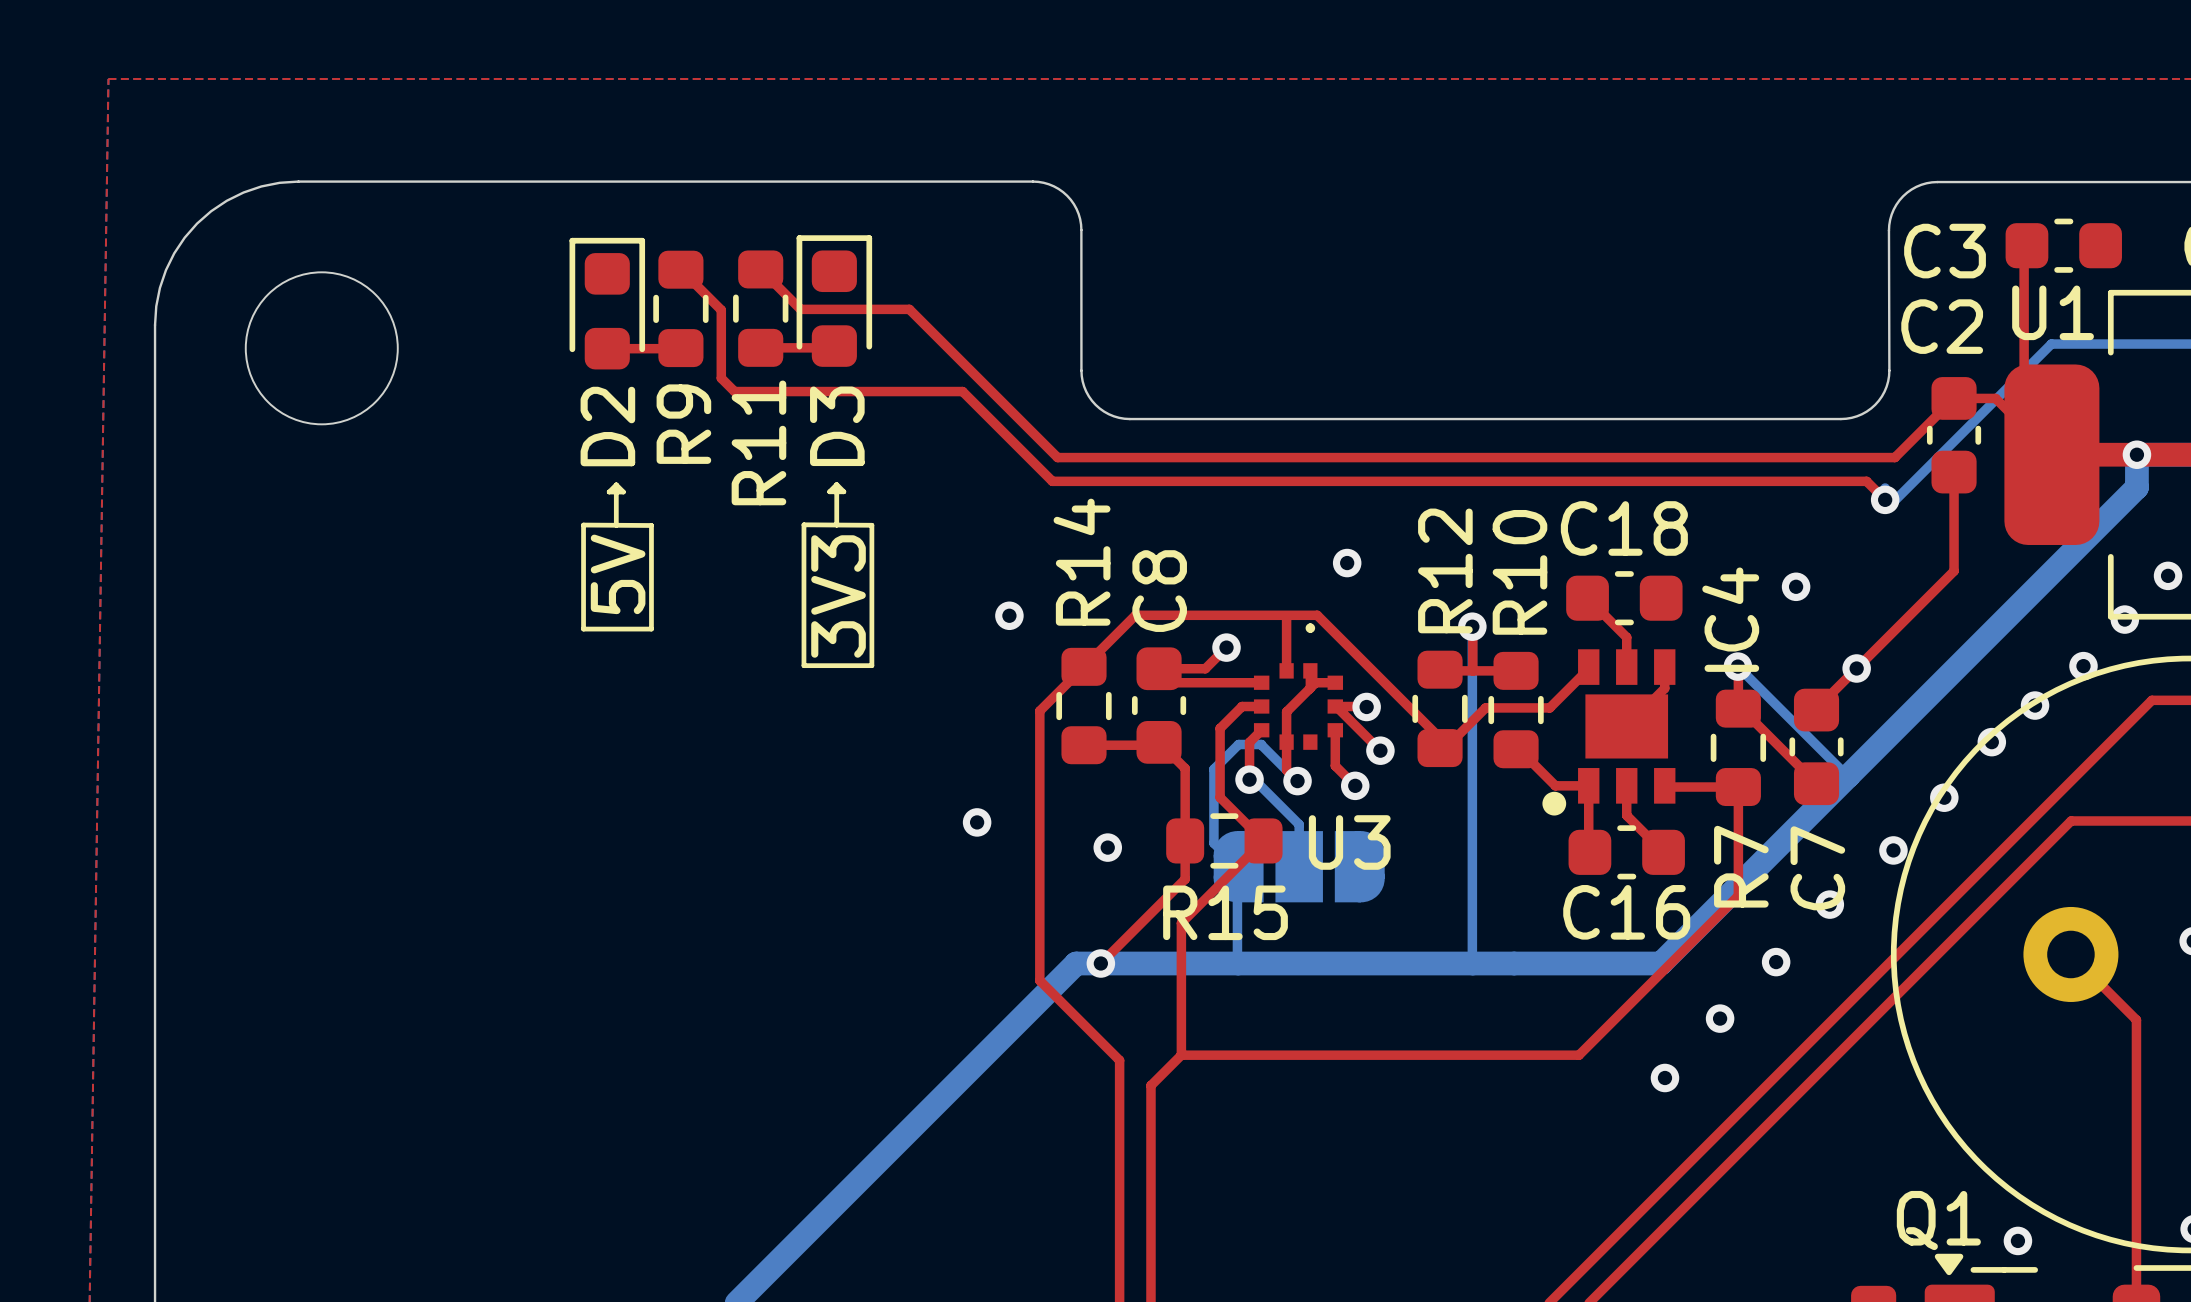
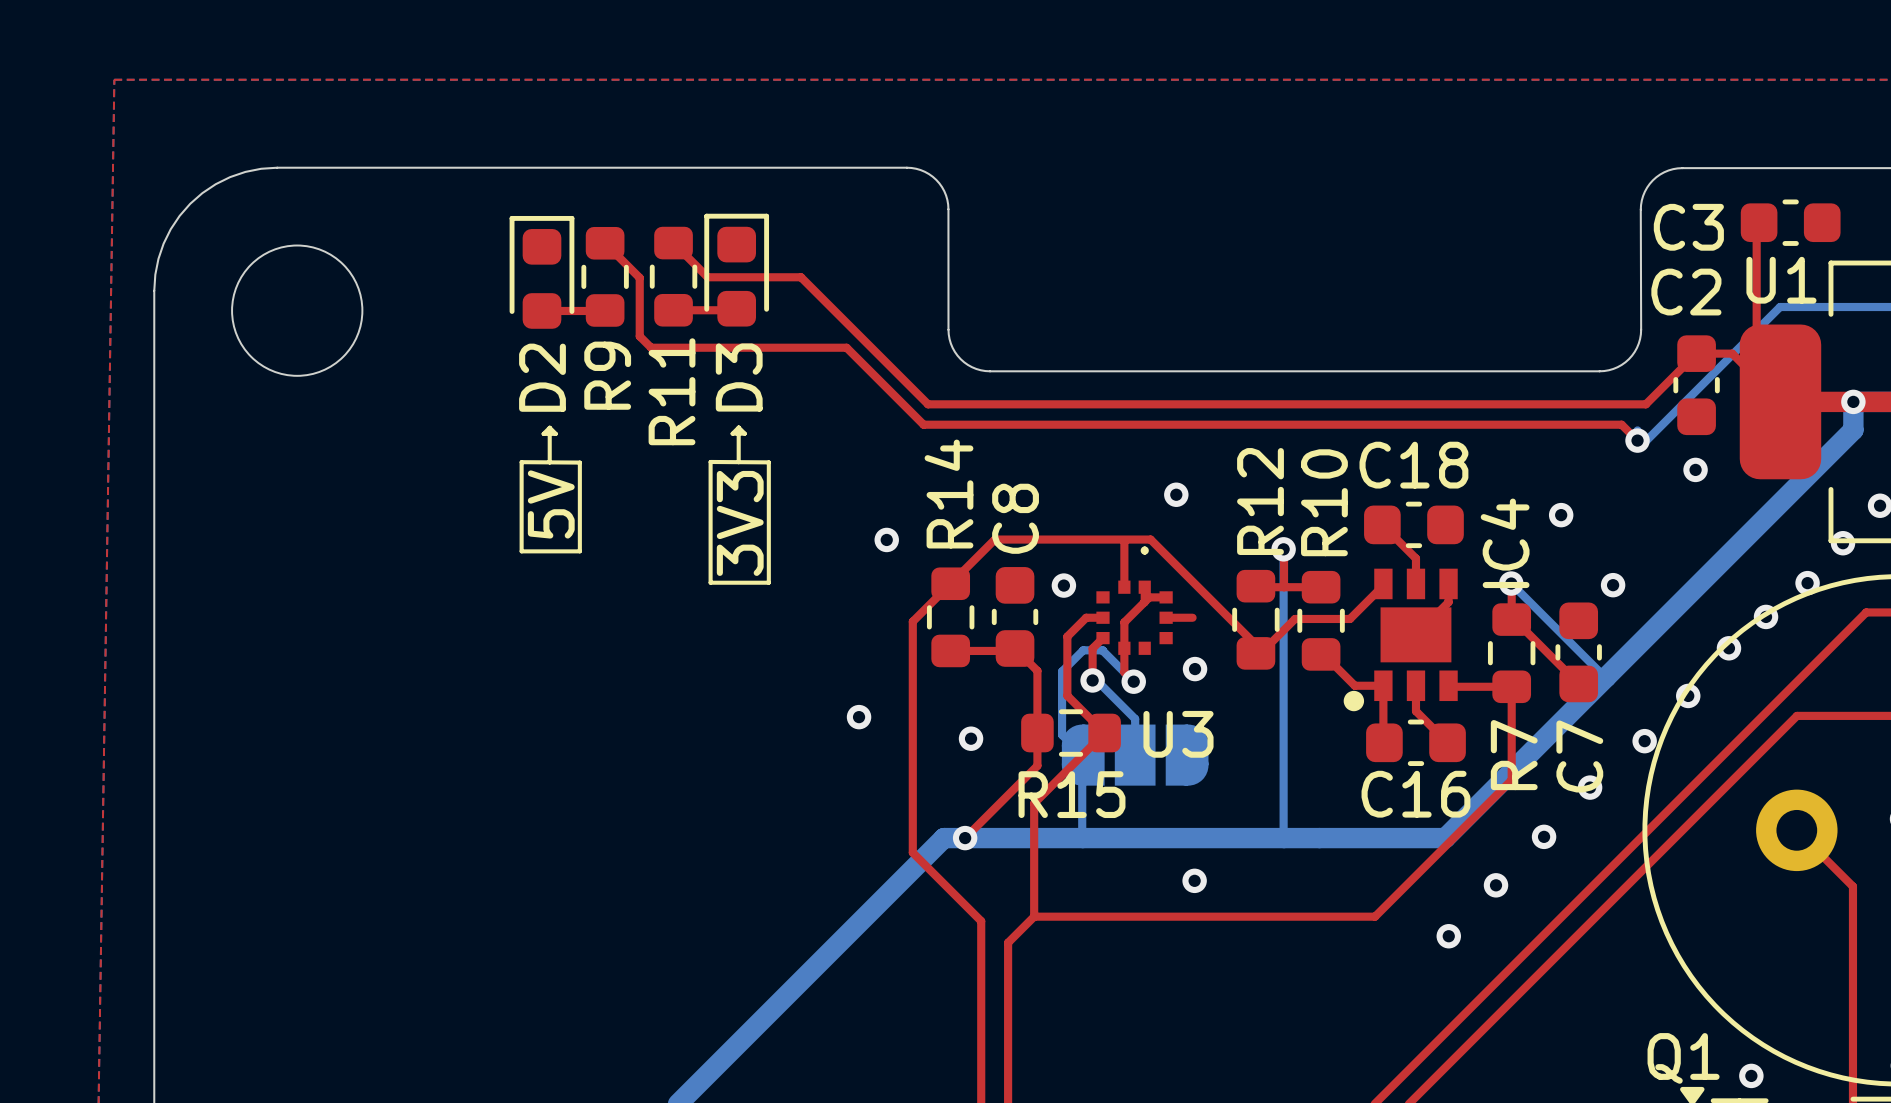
top track: (1954, 472) (1954, 571) (1816, 710) -> none
via: none -> (1695, 469)
top track: (1226, 647) (1205, 668) (1159, 668) (1173, 682) (1261, 682) -> none
via position: (1226, 647) -> (1063, 585)
top track: (1336, 706) (1380, 750) -> none
via: (1366, 706) -> none
top track: (1335, 730) (1335, 765) (1355, 785) -> none
via: (1380, 750) -> none
via: none -> (1195, 669)
via: (1355, 785) -> none
via: none -> (1194, 880)

